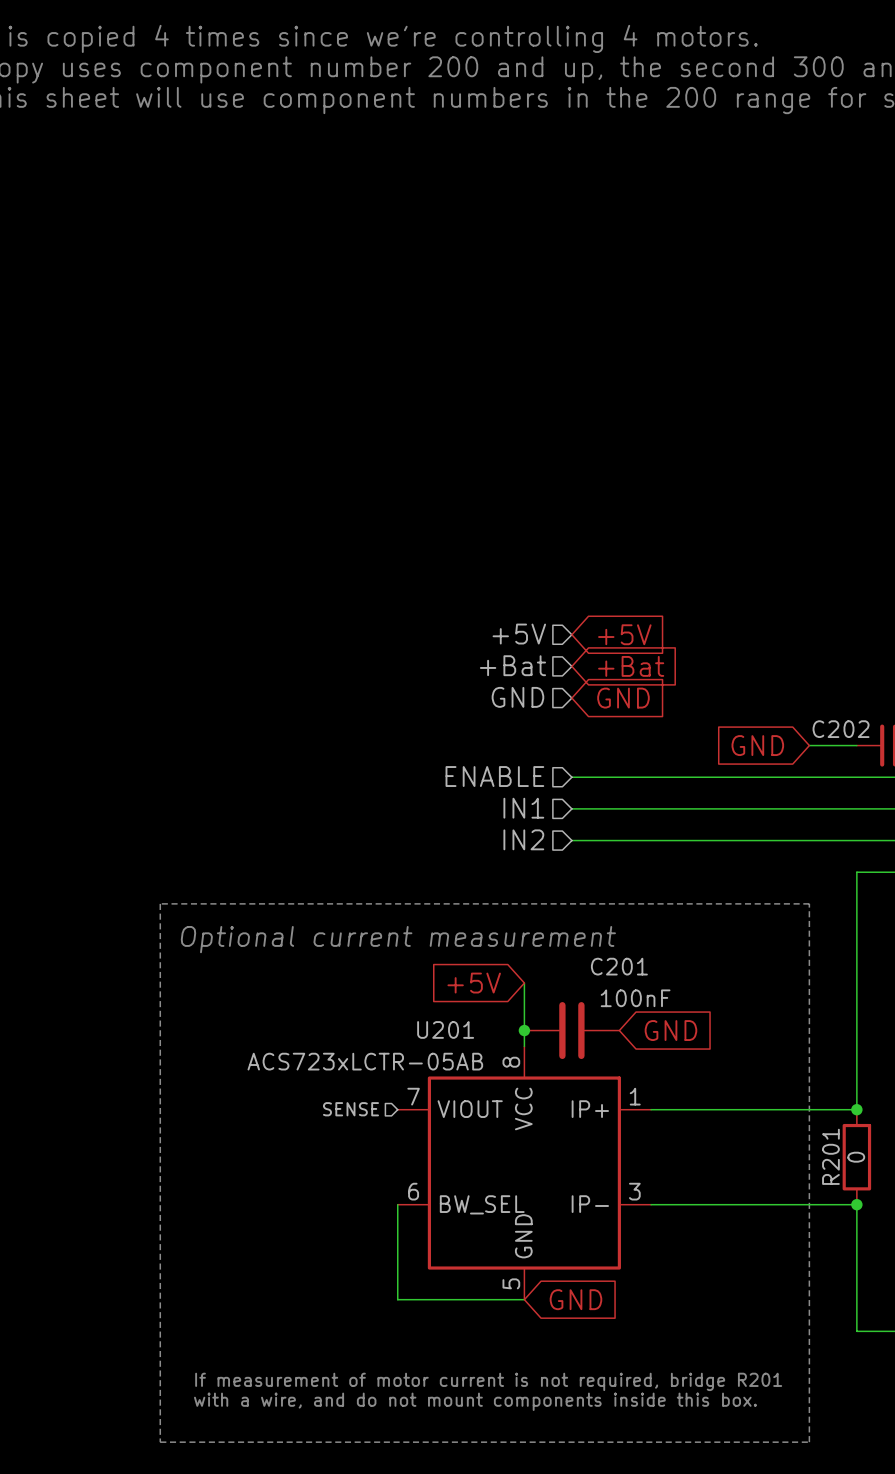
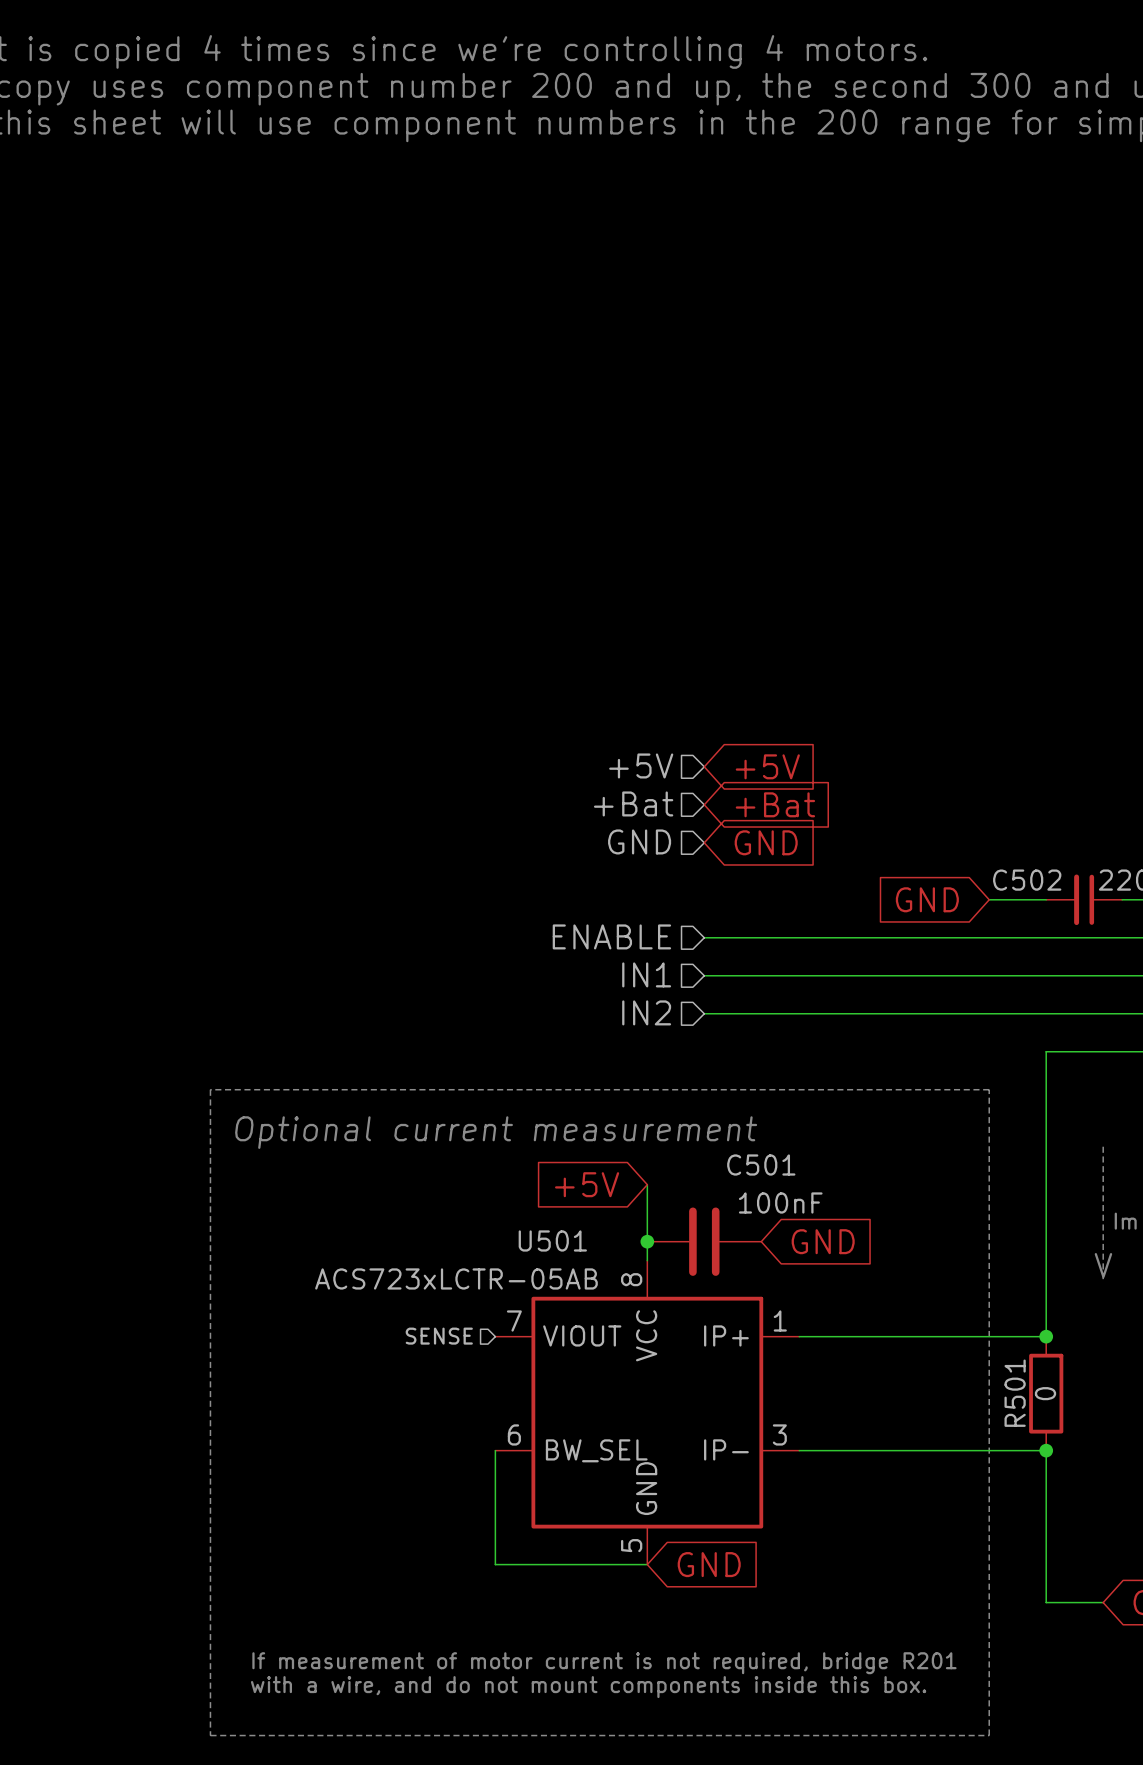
C202 name: C202 (841, 729) -> C502 (1027, 880)
C201 name: C201 (619, 966) -> C501 (761, 1165)
U201 name: U201 (445, 1029) -> U501 (552, 1240)
R201 name: R201 (830, 1156) -> R501 (1015, 1393)

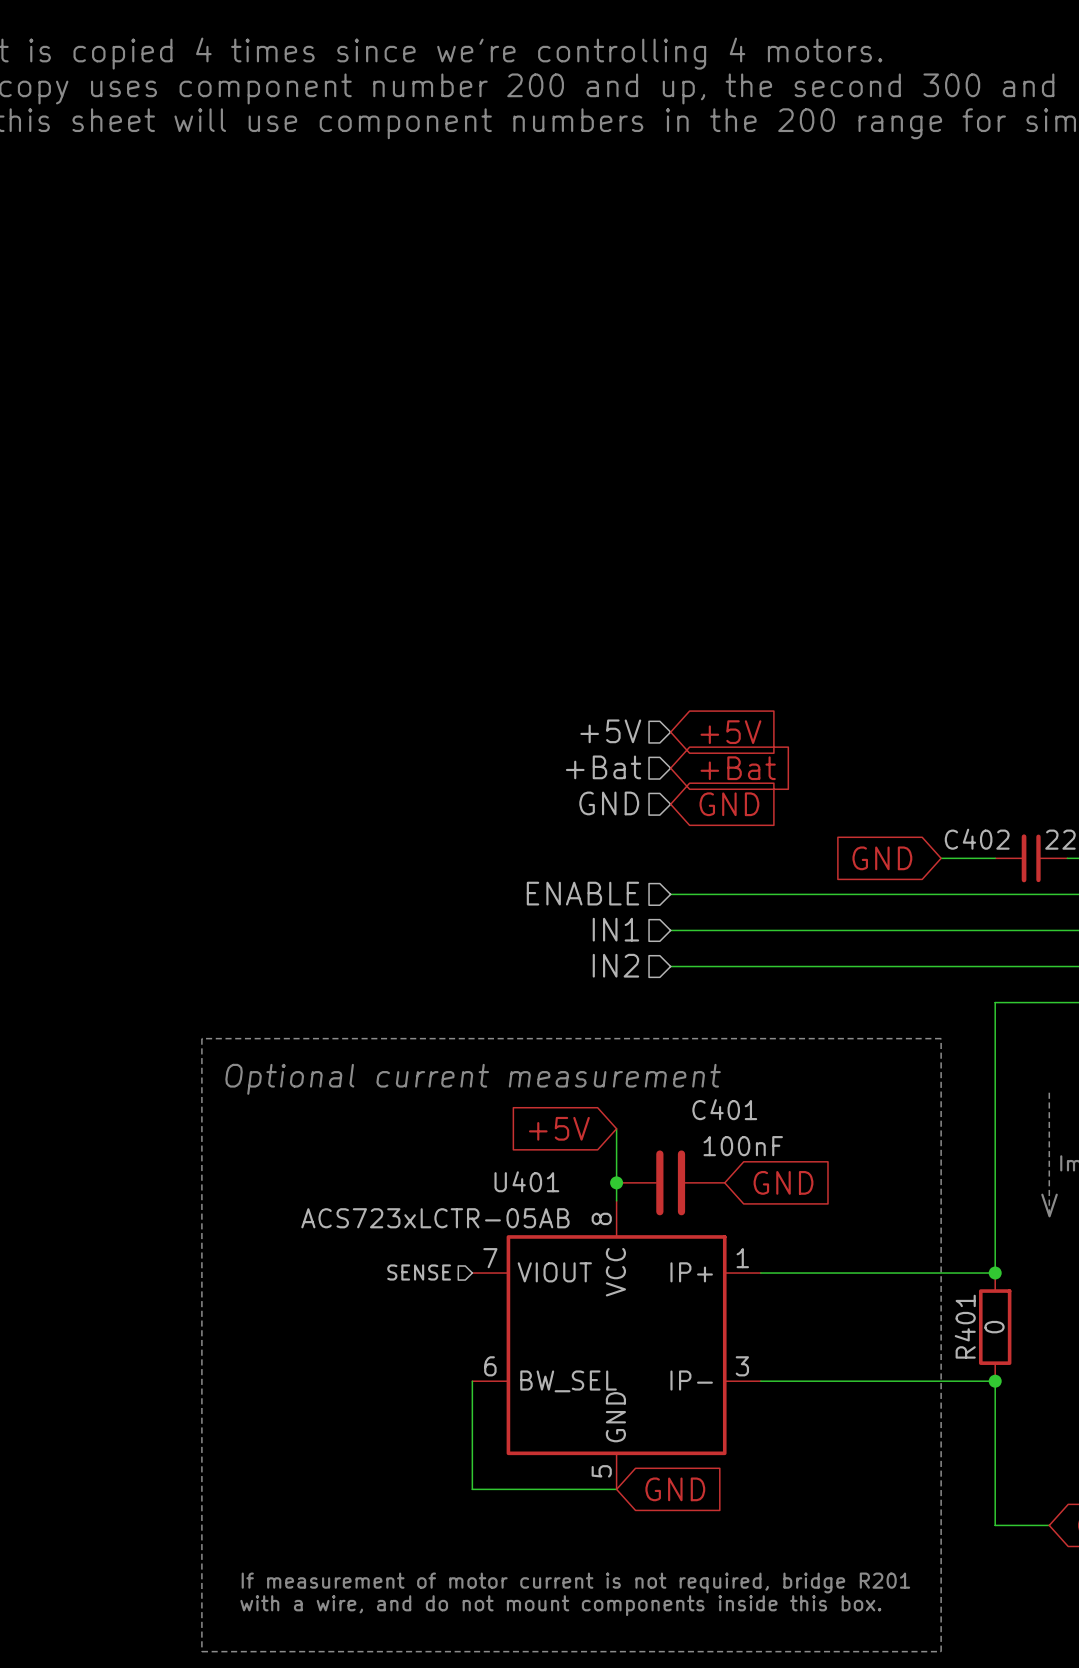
C502 name: C502 (1027, 880) -> C402 (977, 839)
C501 name: C501 (761, 1165) -> C401 (724, 1109)
U501 name: U501 (552, 1240) -> U401 (526, 1181)
R501 name: R501 (1015, 1393) -> R401 (965, 1326)

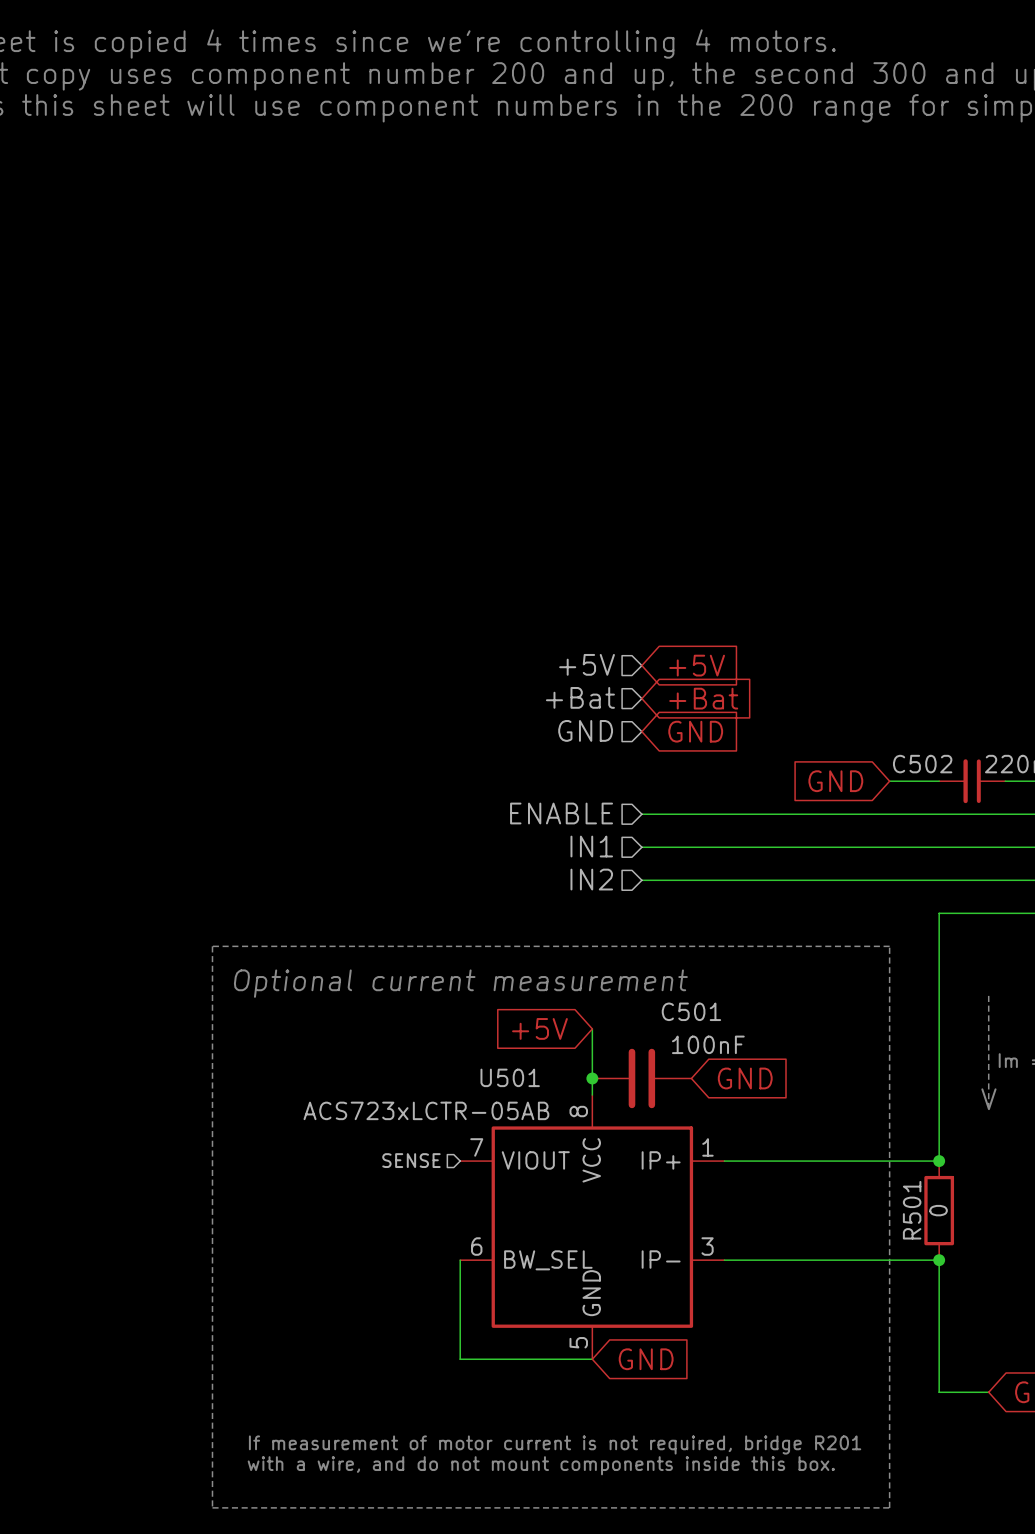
C402 name: C402 (977, 839) -> C502 (922, 764)
C401 name: C401 (724, 1109) -> C501 (691, 1011)
U401 name: U401 (526, 1181) -> U501 (510, 1077)
R401 name: R401 (965, 1326) -> R501 (912, 1210)

